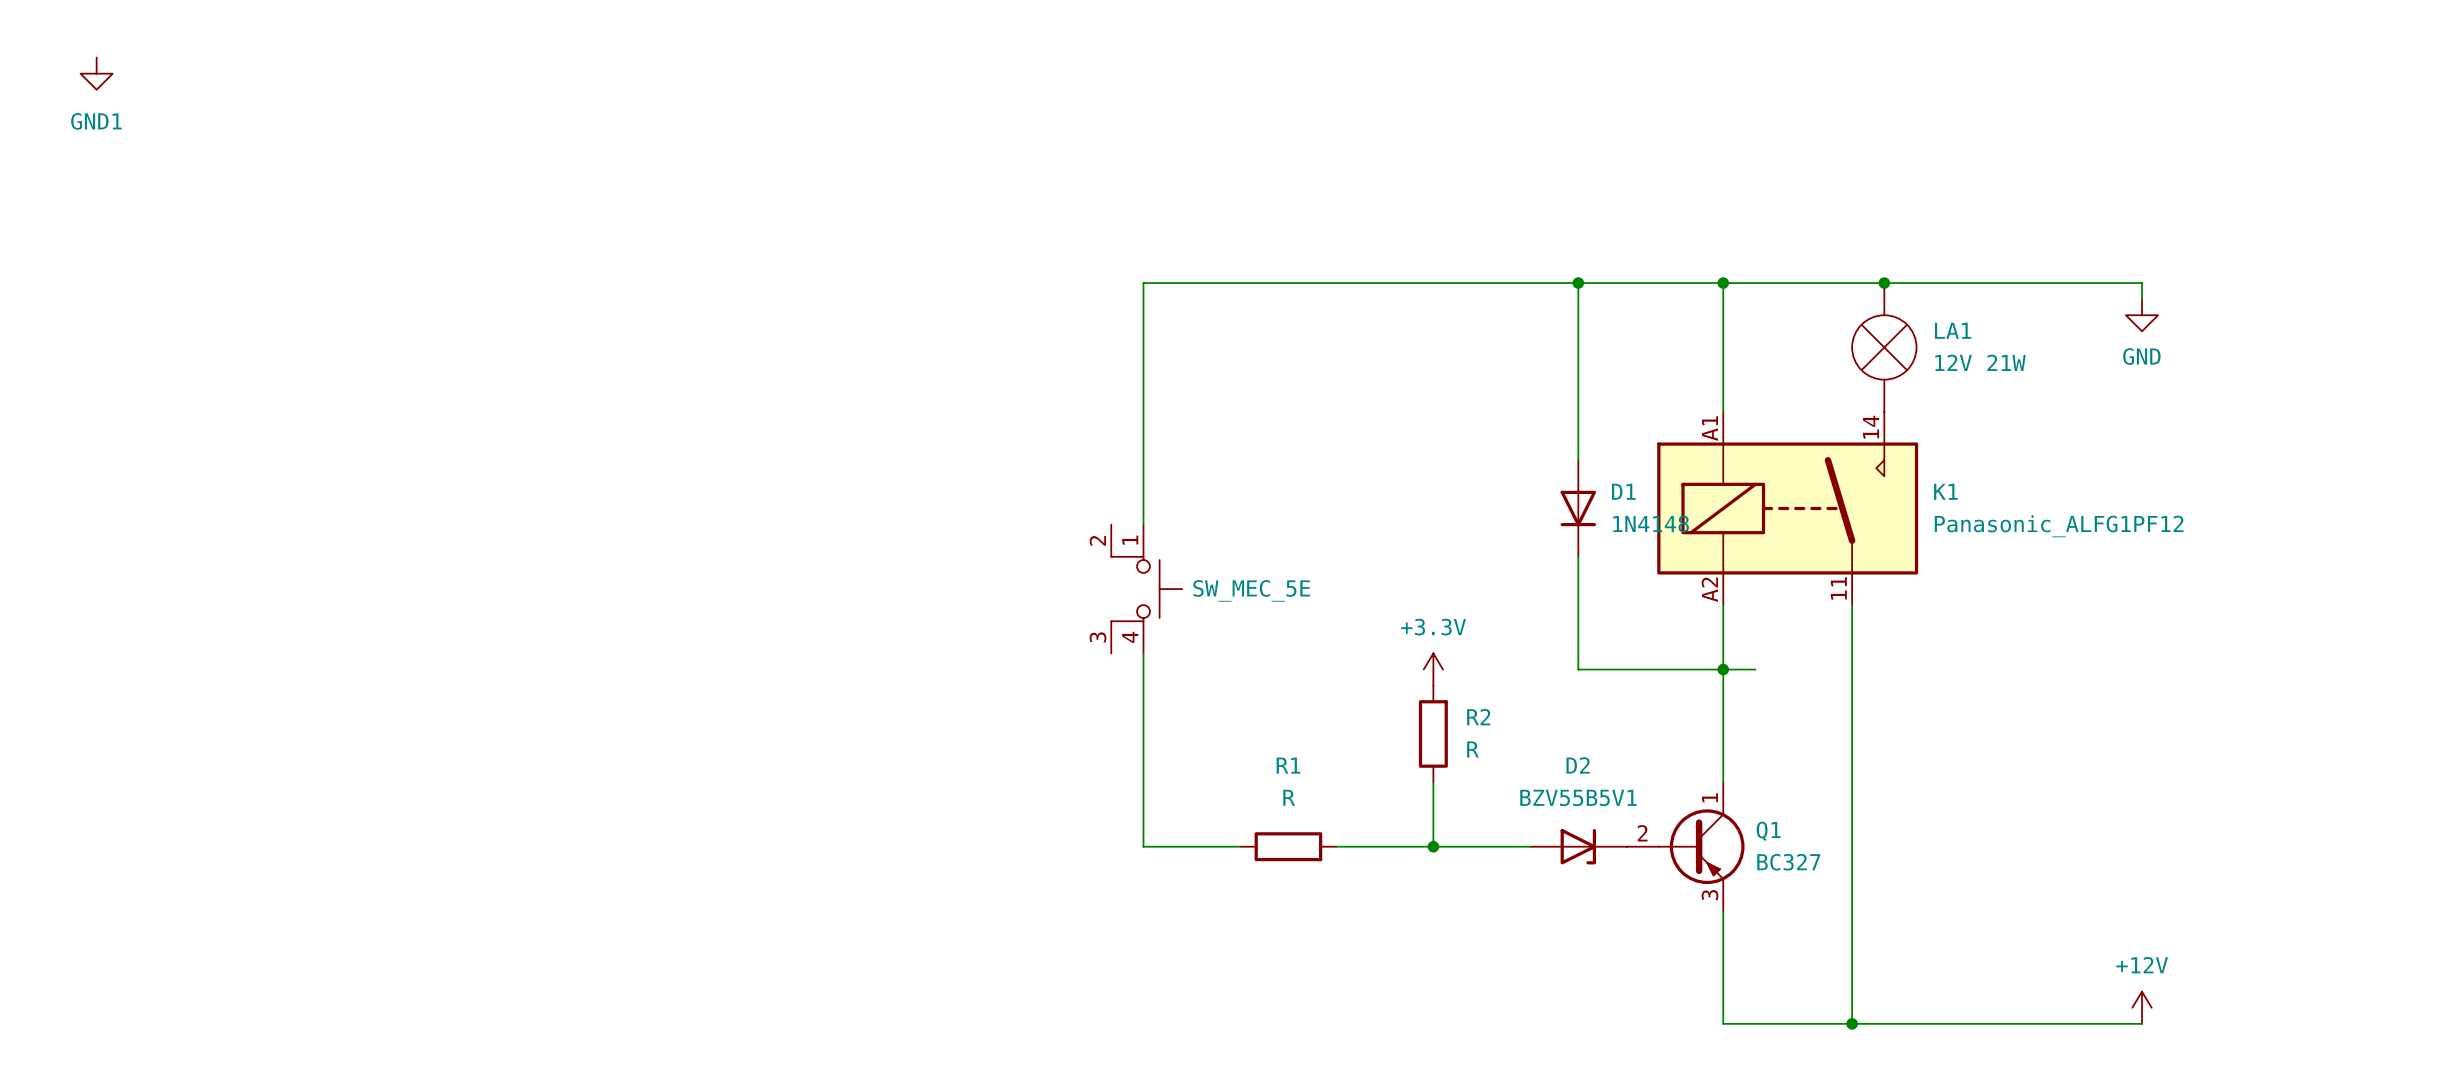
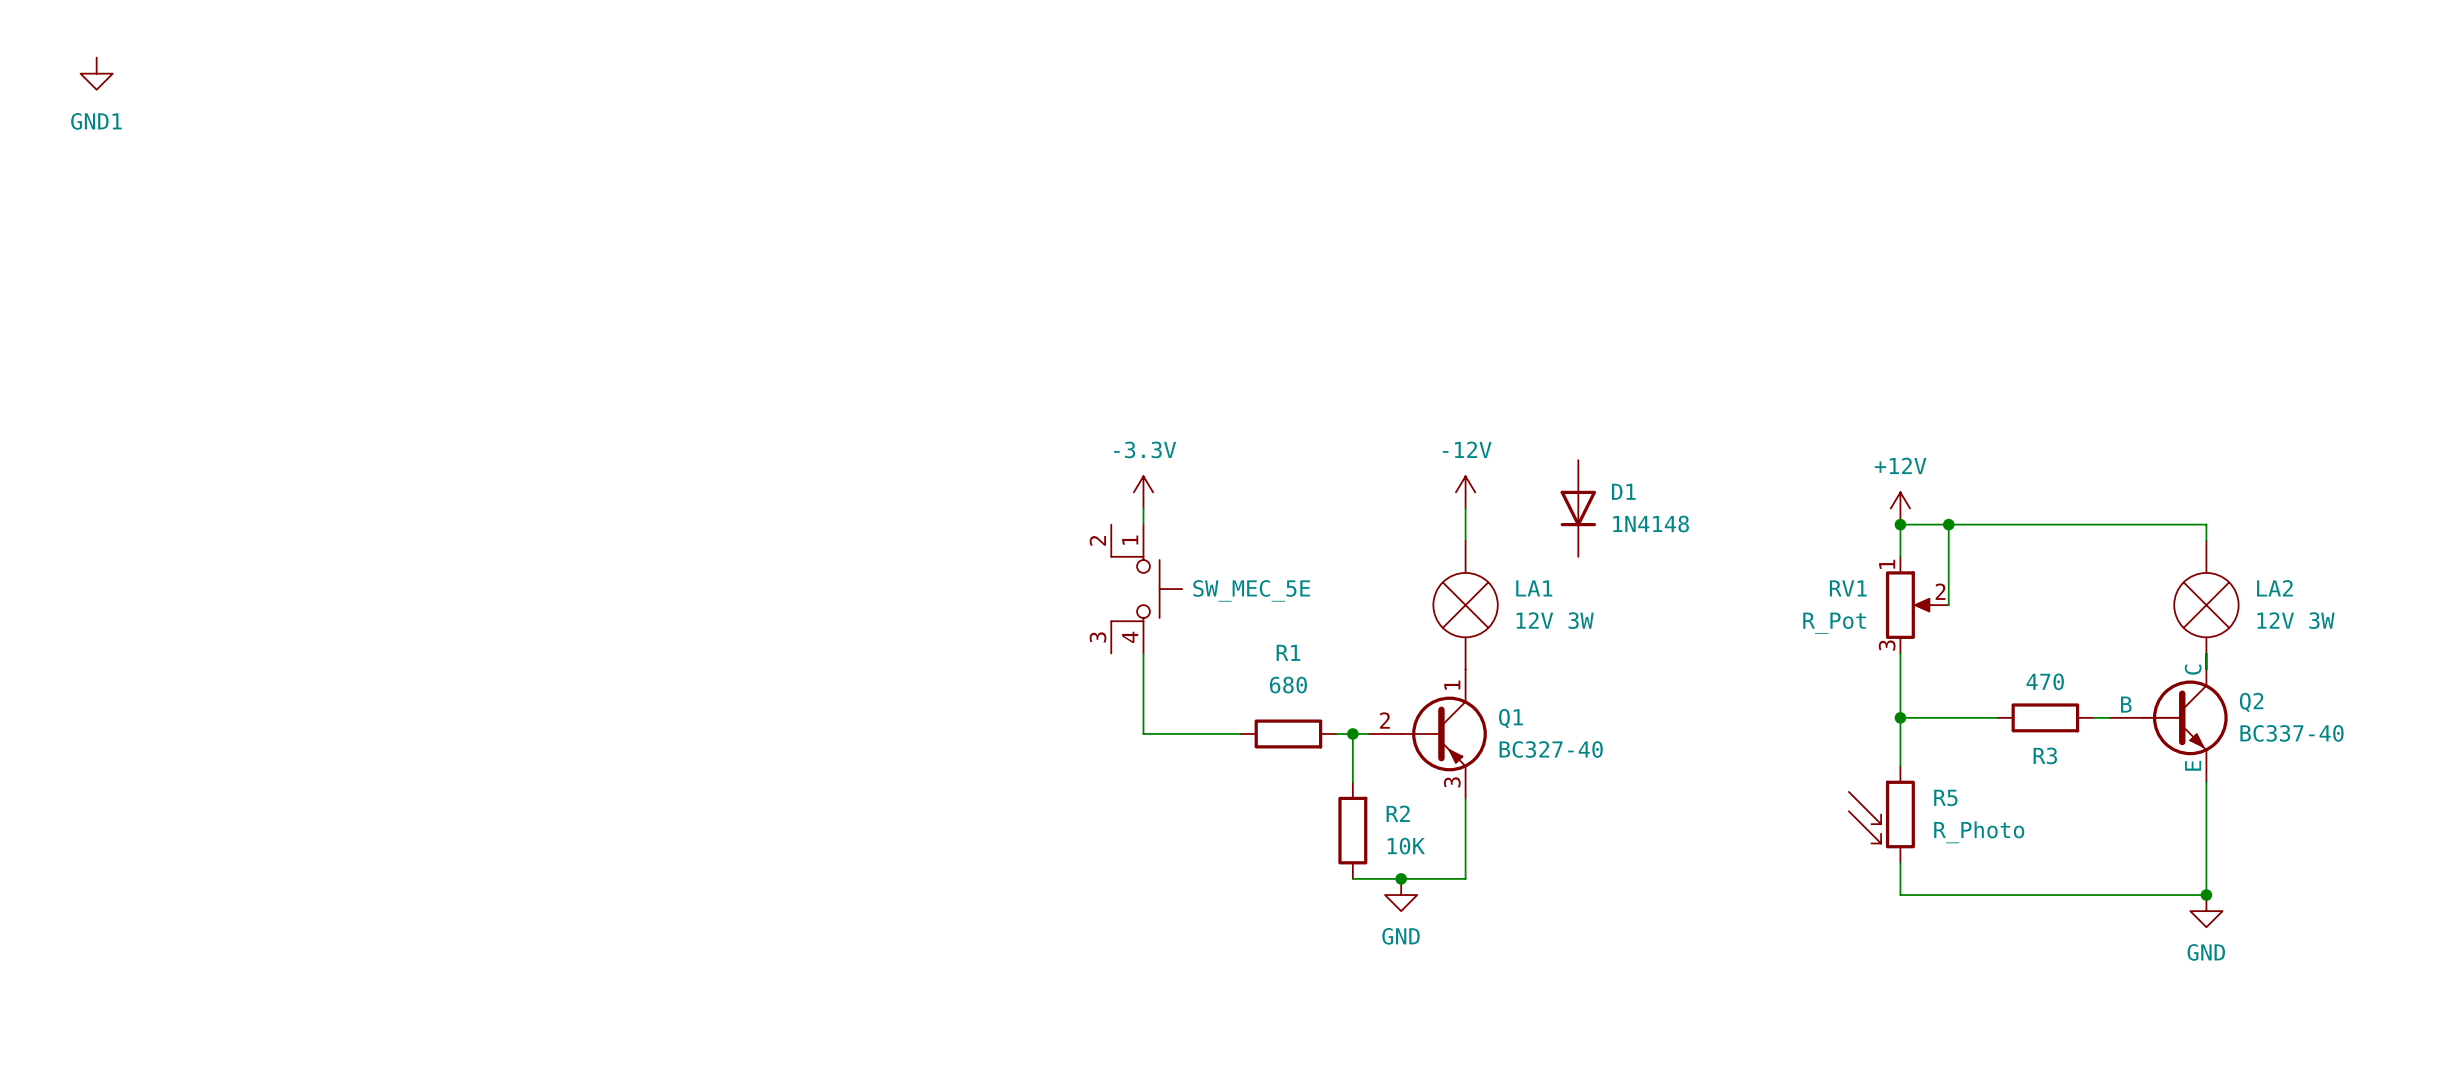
wire: (1578, 283) (1578, 460) -> none
junction: (1578, 283) -> none
wire: (1723, 283) (1723, 411) -> none
junction: (1723, 283) -> none
junction: (1884, 283) -> none
wire: (2142, 299) (2142, 283) (1143, 283) (1143, 508) -> none
power symbol: GND (2142, 315) -> none
LA1 position: (1884, 347) -> (1465, 605)
LA1 value: 12V 21W (1980, 362) -> 12V 3W (1555, 620)
power symbol: none -> -3.3V (1143, 492)
power symbol: none -> -12V (1465, 492)
wire: none -> (1465, 508) (1465, 540)
K1: Panasonic_ALFG1PF12 (1787, 508) -> none
power symbol: none -> +12V (1900, 508)
junction: none -> (1900, 524)
wire: none -> (1948, 524) (1948, 605)
junction: none -> (1948, 524)
wire: none -> (2206, 540) (2206, 524) (1900, 524) (1900, 556)
wire: (1578, 556) (1578, 669) (1755, 669) -> none
wire: (1723, 605) (1723, 782) -> none
wire: (1852, 605) (1852, 1023) -> none
RV1: none -> R_Pot (1917, 605)
LA2: none -> 12V 3W (2206, 605)
wire: none -> (1900, 653) (1900, 766)
wire: none -> (2206, 653) (2206, 669)
power symbol: +3.3V (1433, 669) -> none
junction: (1723, 669) -> none
wire: none -> (1900, 717) (1997, 717)
junction: none -> (1900, 717)
R3: none -> 470 (2045, 717)
wire: none -> (2093, 717) (2109, 717)
Q2: none -> BC337-40 (2168, 717)
wire: (1143, 733) (1143, 846) (1240, 846) -> (1143, 733) (1240, 733)
wire: none -> (1336, 733) (1368, 733)
wire: none -> (1352, 733) (1352, 782)
junction: none -> (1352, 733)
R2 position: (1433, 733) -> (1352, 830)
R2 value: R (1473, 749) -> 10K (1406, 846)
wire: (1433, 782) (1433, 846) -> none
wire: none -> (2206, 782) (2206, 895) (1900, 895) (1900, 862)
R1 value: R (1289, 797) -> 680 (1288, 685)
wire: none -> (1465, 798) (1465, 878) (1352, 878)
R5: none -> R_Photo (1881, 814)
R1 position: (1288, 846) -> (1288, 733)
wire: (1336, 846) (1530, 846) -> none
junction position: (1433, 846) -> (1401, 878)
D2: BZV55B5V1 (1578, 846) -> none
Q1 position: (1685, 846) -> (1427, 733)
Q1 value: BC327 (1788, 862) -> BC327-40 (1551, 749)
power symbol: none -> GND (1401, 895)
junction: none -> (2206, 895)
wire: (1723, 911) (1723, 1023) (2142, 1023) -> none
power symbol: none -> GND (2206, 911)
power symbol: +12V (2142, 1007) -> none
junction: (1852, 1023) -> none

